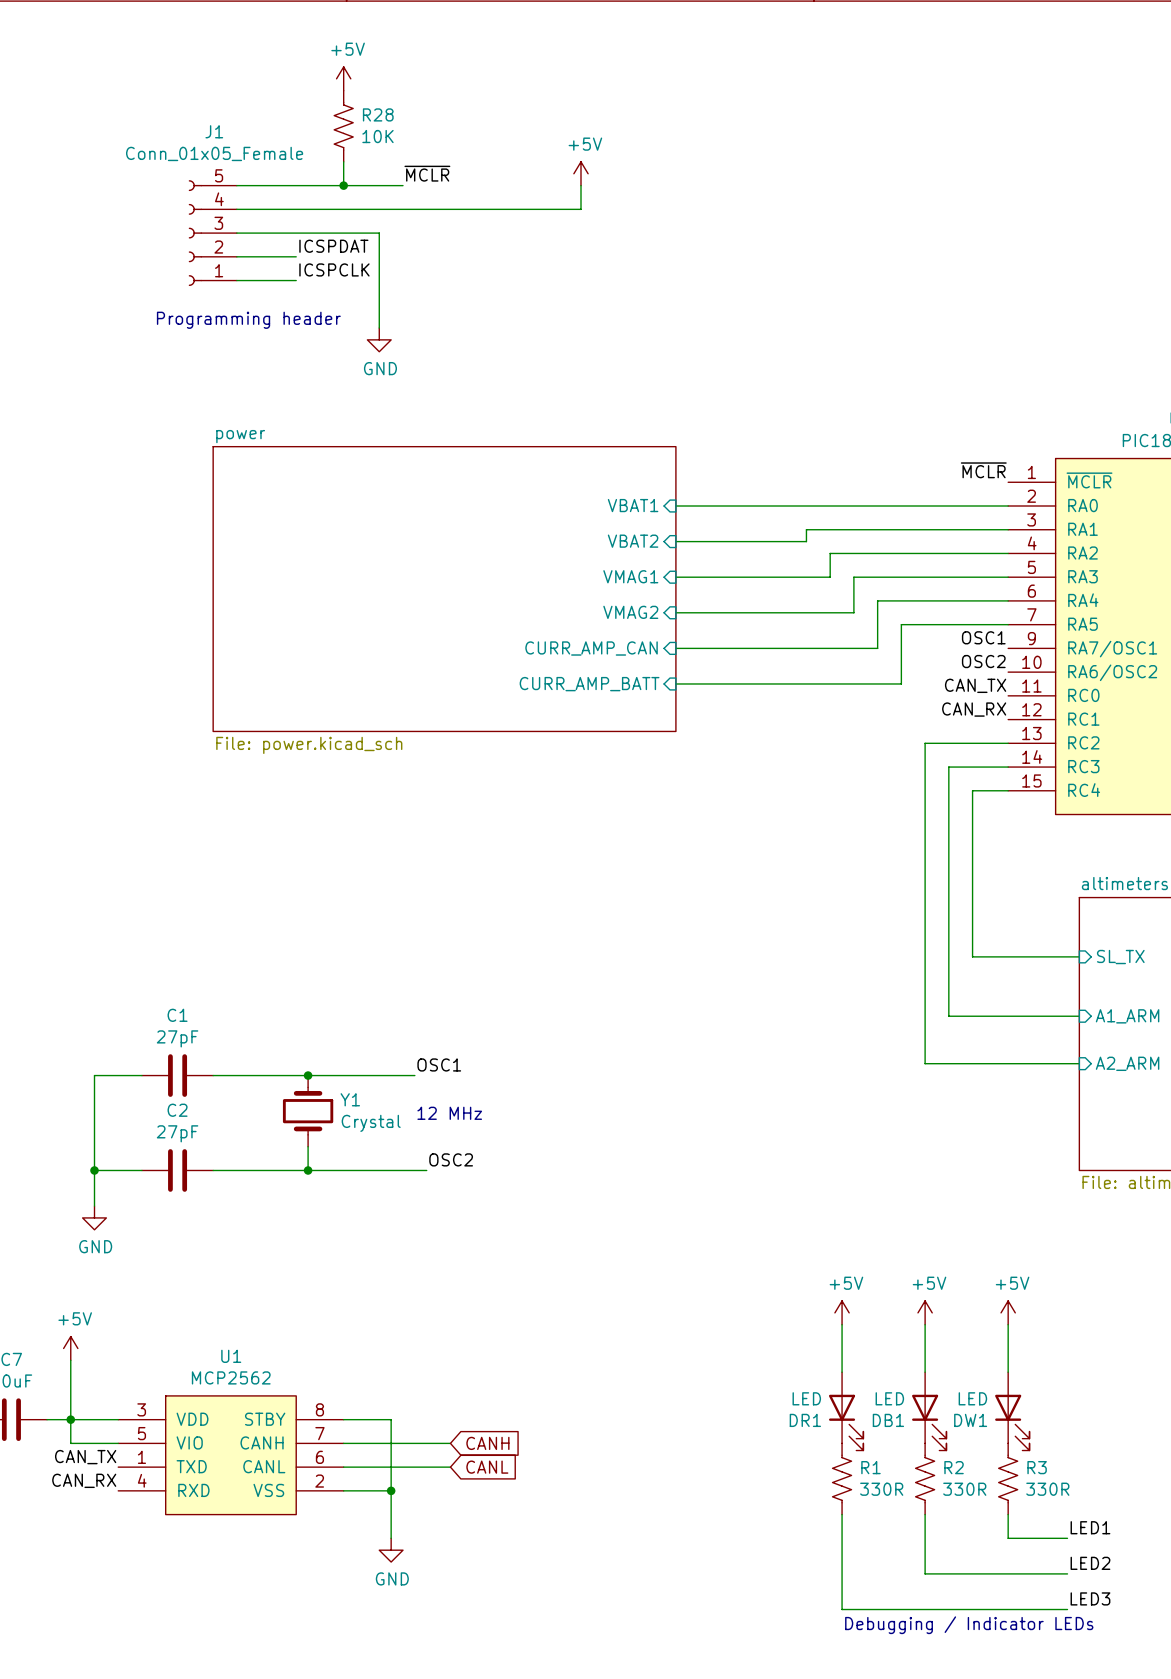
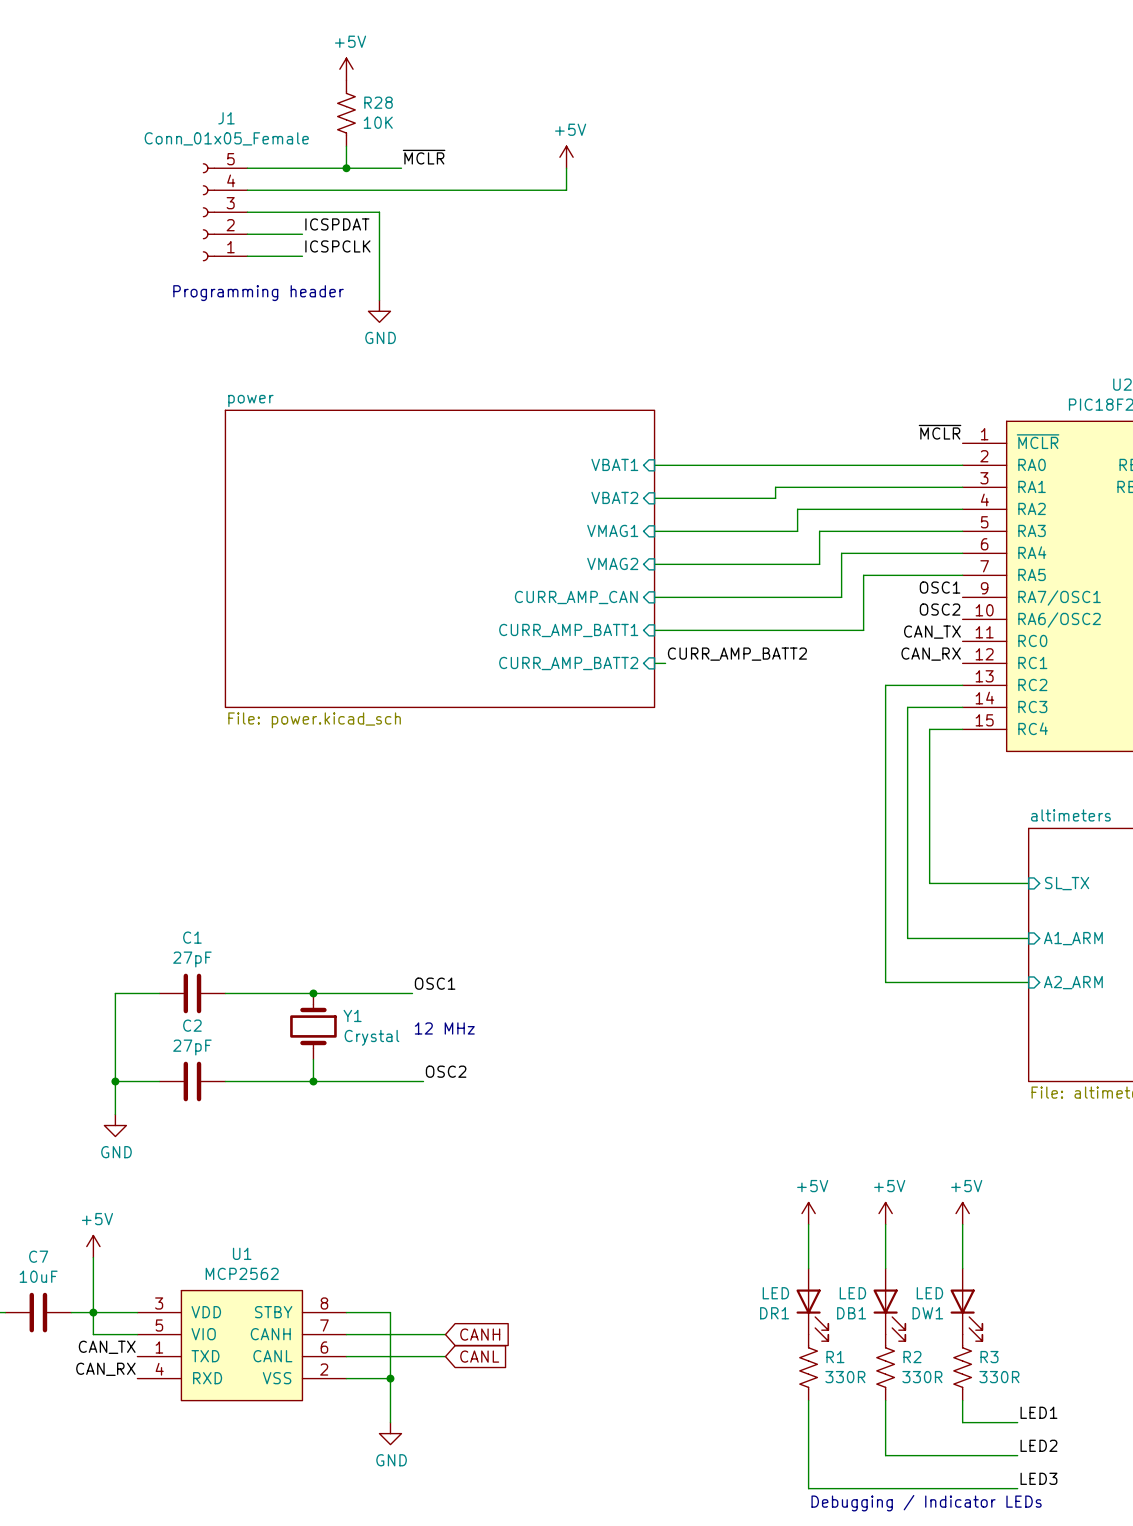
sheet power: File: power.kicad_sch (444, 589) -> none
sheet power: none -> File: power.kicad_sch (439, 558)
sheet pin: CURR_AMP_BATT (589, 684) -> CURR_AMP_BATT1 (568, 630)
label: none -> CURR_AMP_BATT2 (737, 654)
sheet pin: none -> CURR_AMP_BATT2 (568, 663)
wire: none -> (654, 663) (665, 663)

